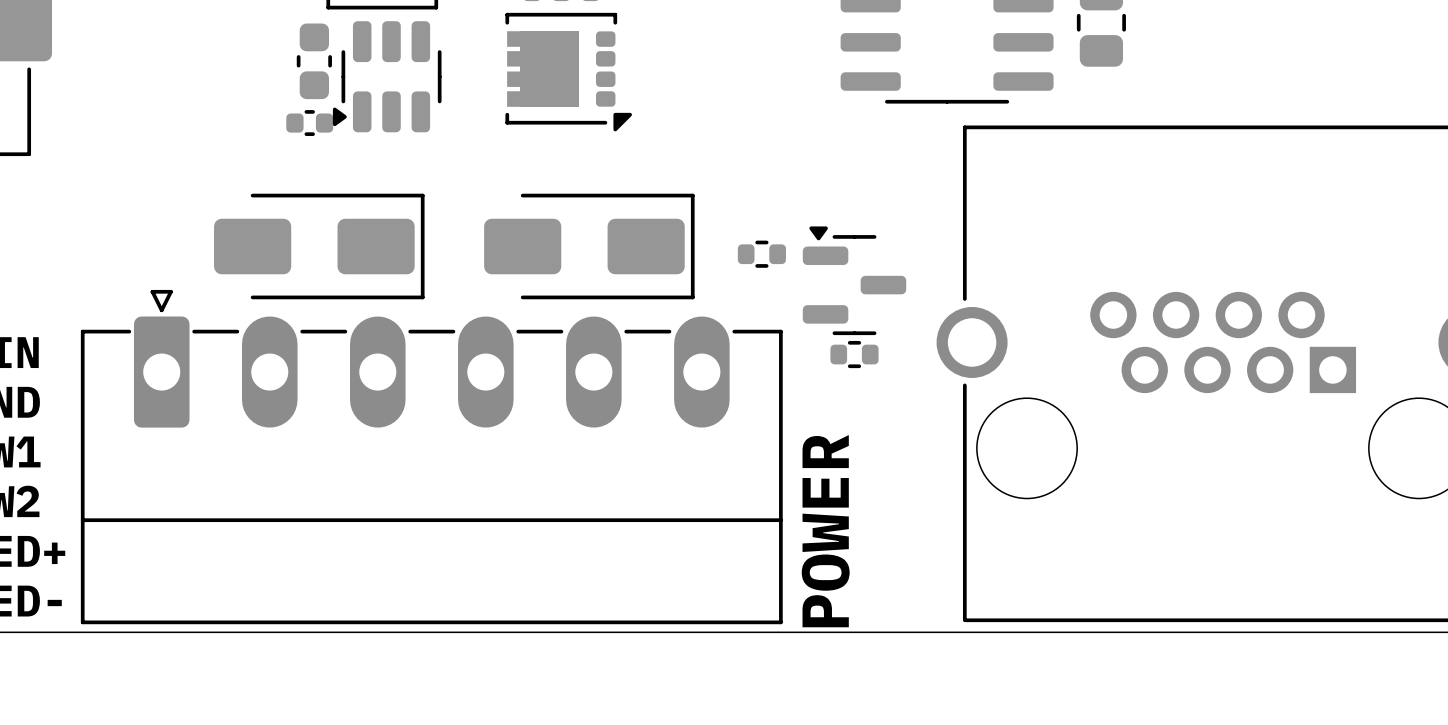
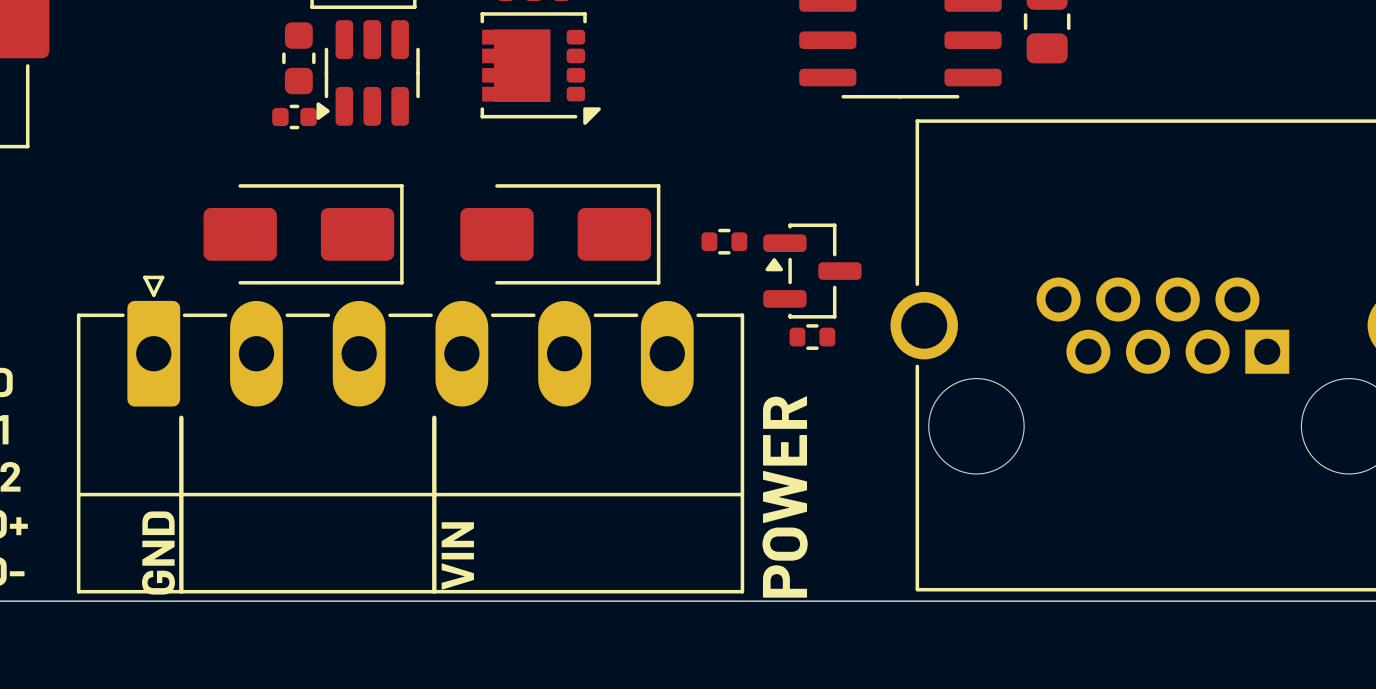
part footprint: [802, 226, 907, 336] -> [763, 223, 862, 319]
line: none -> (181, 417) (181, 591)
line: none -> (434, 417) (434, 591)
text: none -> VIN (457, 555)
text: none -> GND (158, 553)

